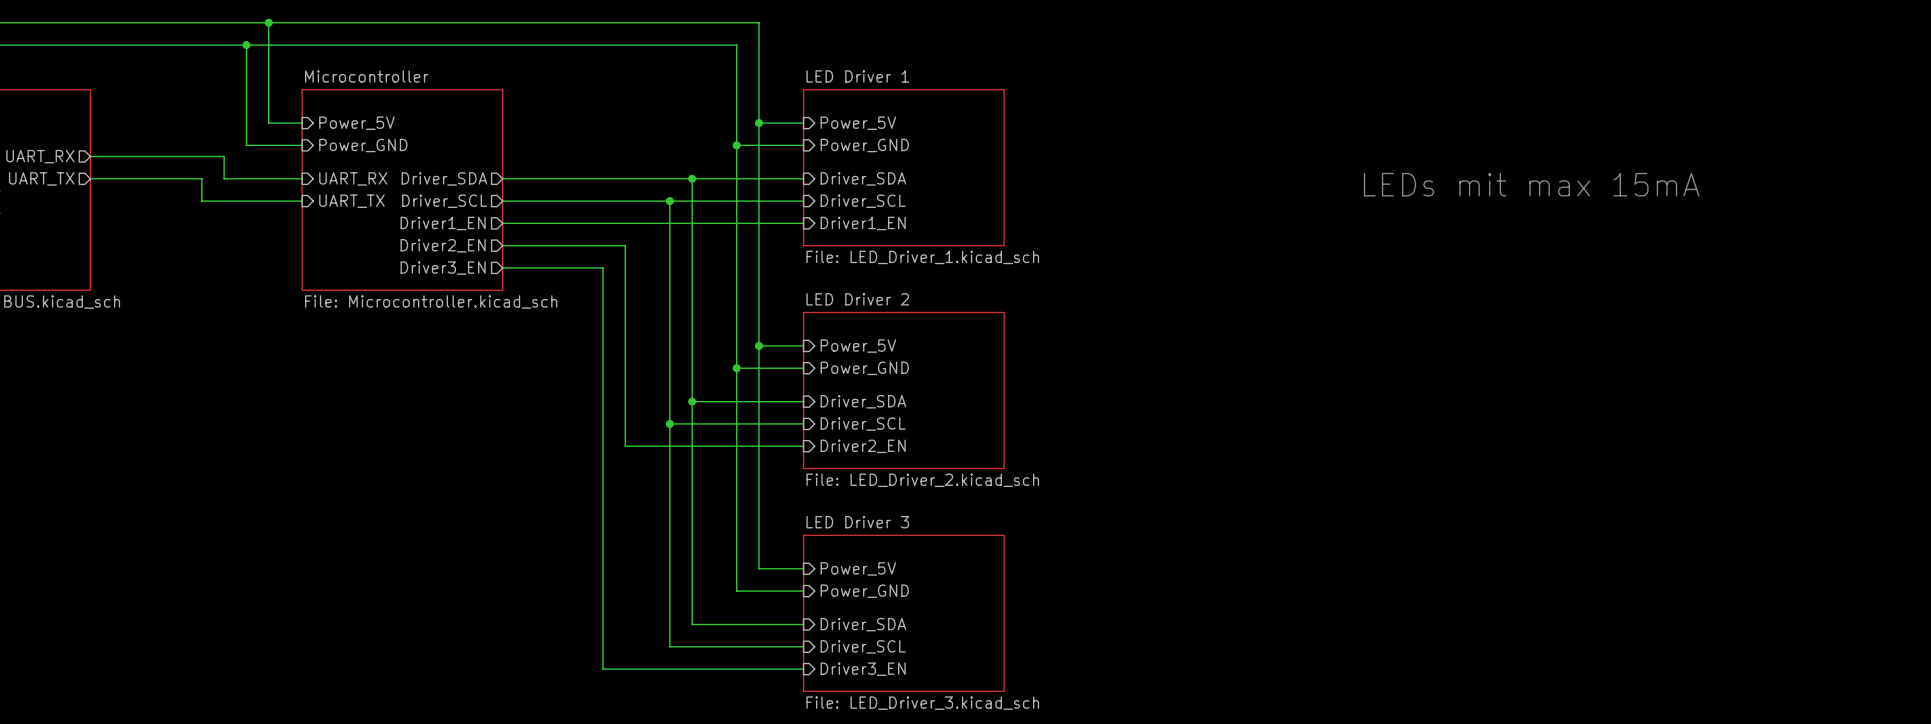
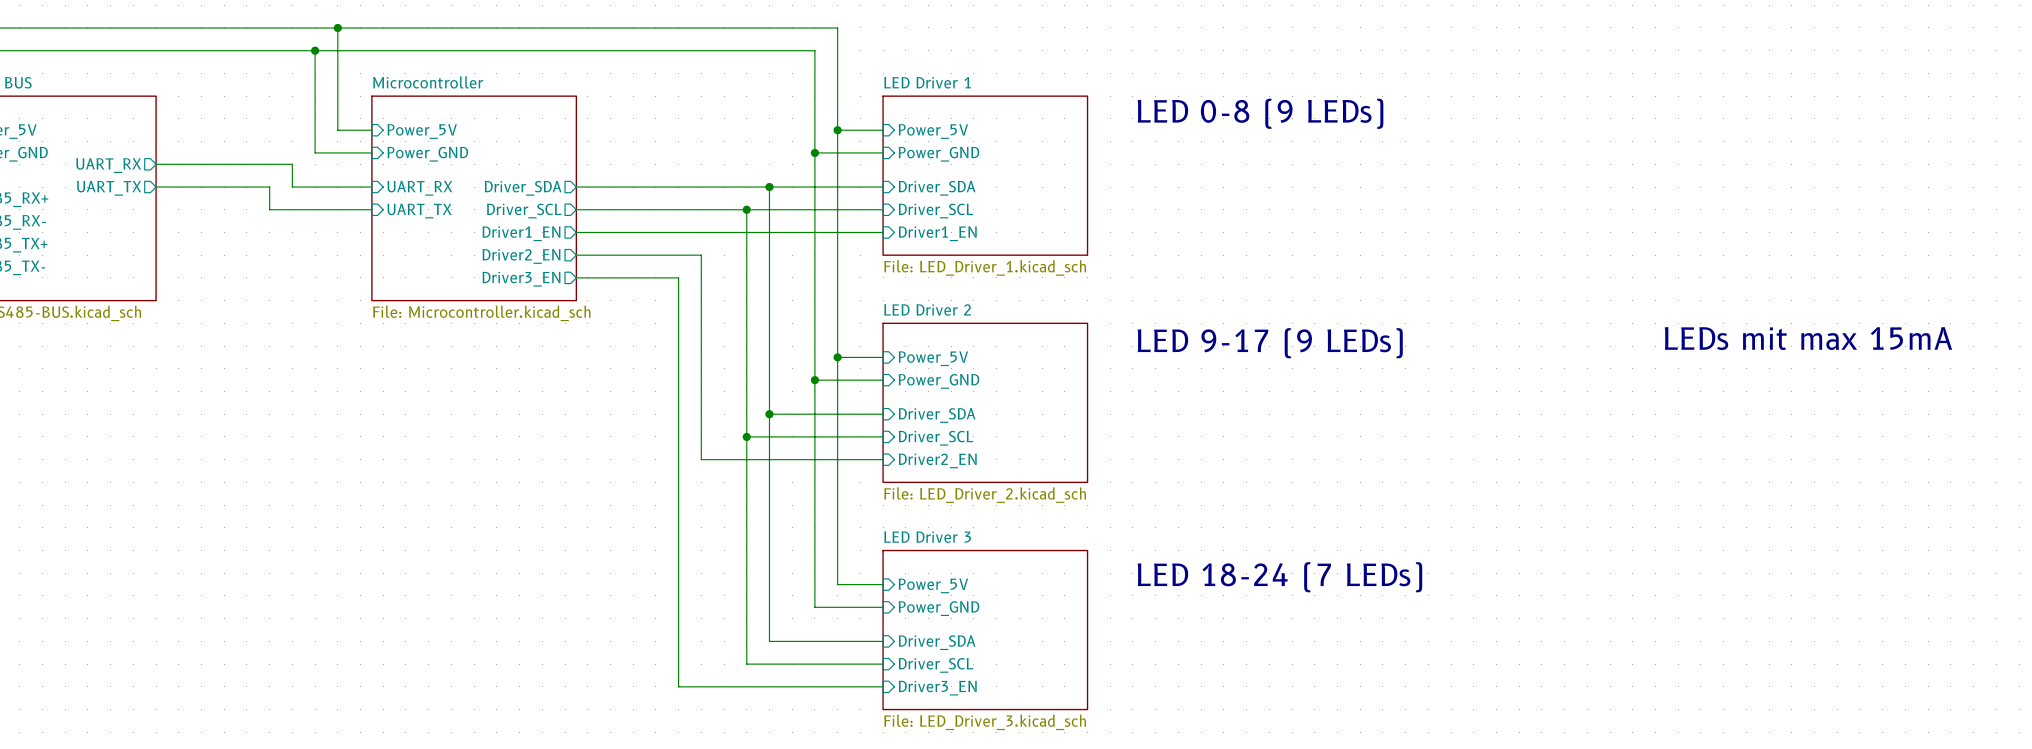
text: none -> LED 0-8 (9 LEDs) (1260, 113)
text: LEDs mit max 15mA (1531, 184) -> none
text: none -> LEDs mit max 15mA (1808, 338)
text: none -> LED 9-17 (9 LEDs) (1270, 343)
text: none -> LED 18-24 (7 LEDs) (1279, 577)

